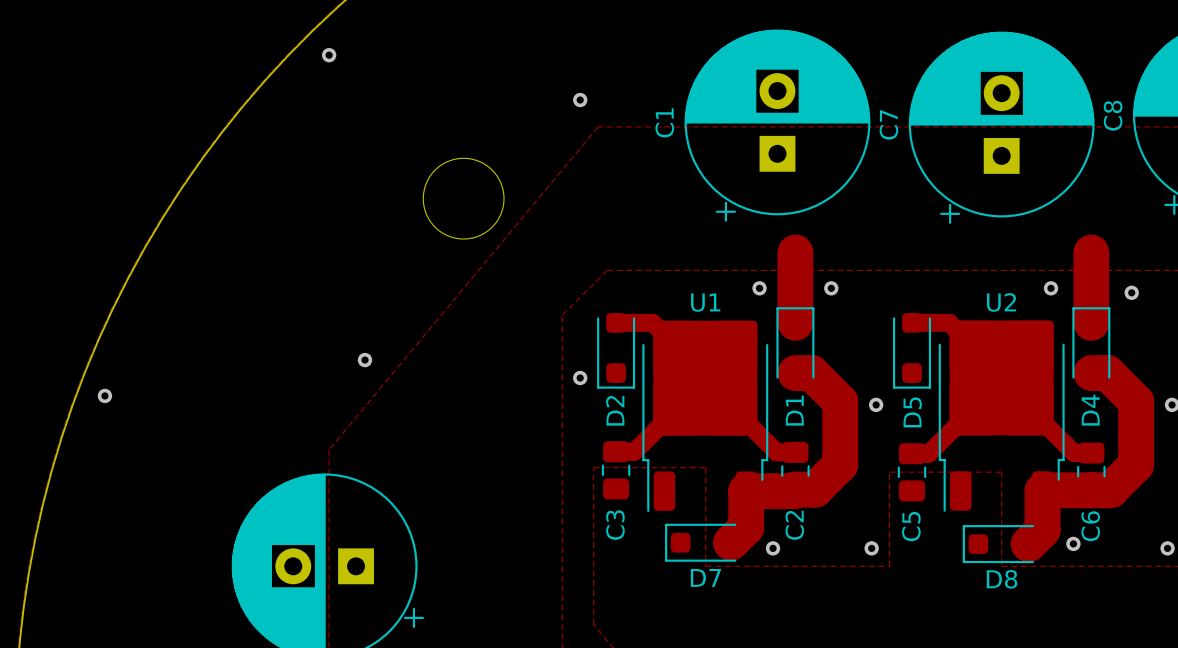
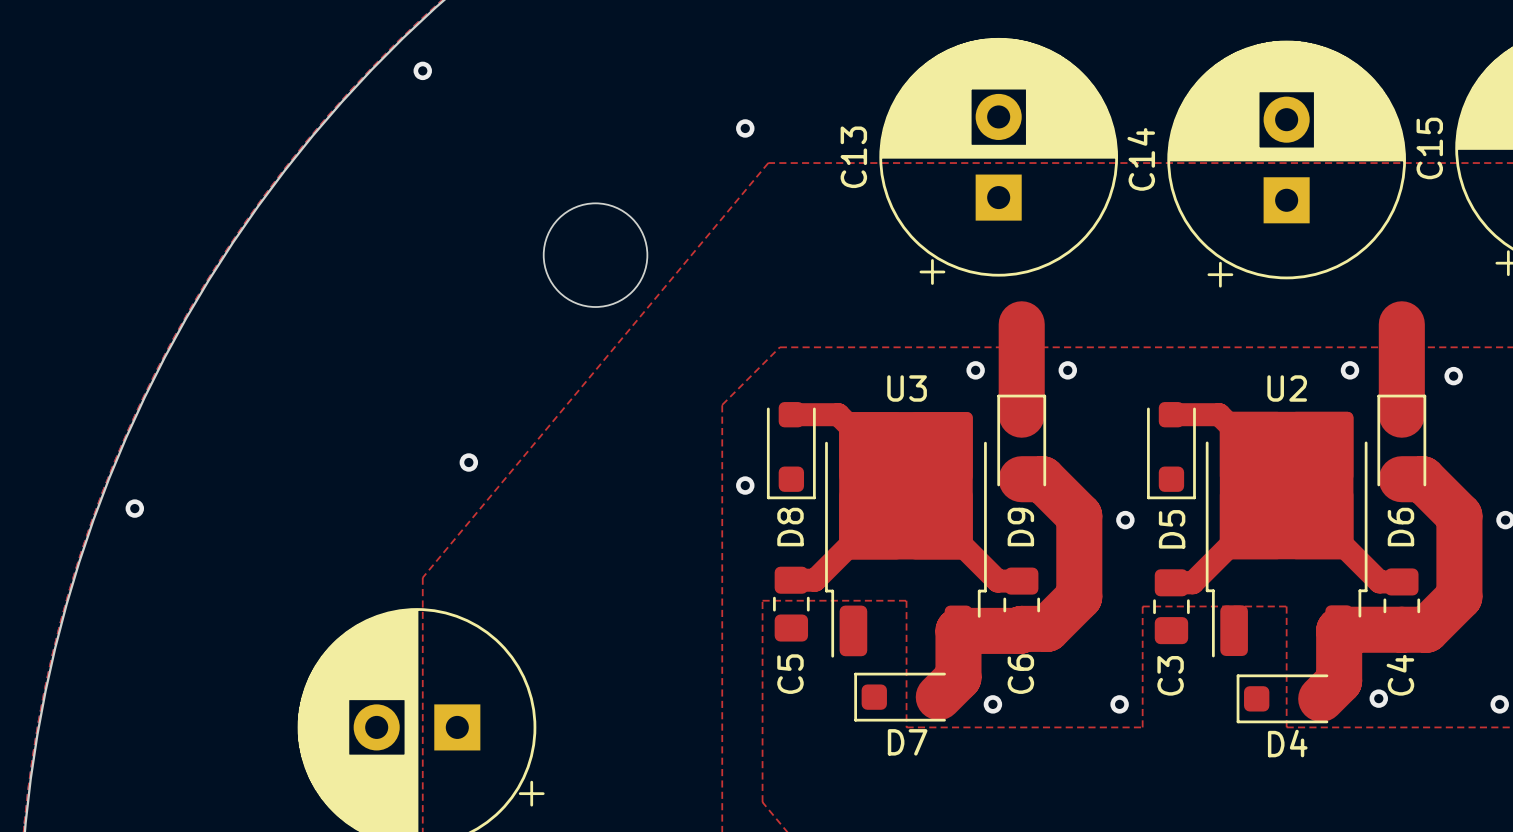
C8 name: C8 (1113, 115) -> C15 (1429, 148)
C1 name: C1 (664, 122) -> C13 (853, 157)
C7 name: C7 (888, 124) -> C14 (1141, 159)
U1 name: U1 (705, 302) -> U3 (907, 388)
D2 name: D2 (615, 410) -> D8 (790, 527)
D1 name: D1 (794, 410) -> D9 (1020, 527)
D4 name: D4 (1090, 410) -> D6 (1400, 527)
C3 name: C3 (615, 525) -> C5 (790, 674)
C2 name: C2 (794, 525) -> C6 (1020, 674)
C5 name: C5 (911, 526) -> C3 (1170, 675)
C6 name: C6 (1090, 526) -> C4 (1400, 675)
D8 name: D8 (1002, 579) -> D4 (1287, 743)

